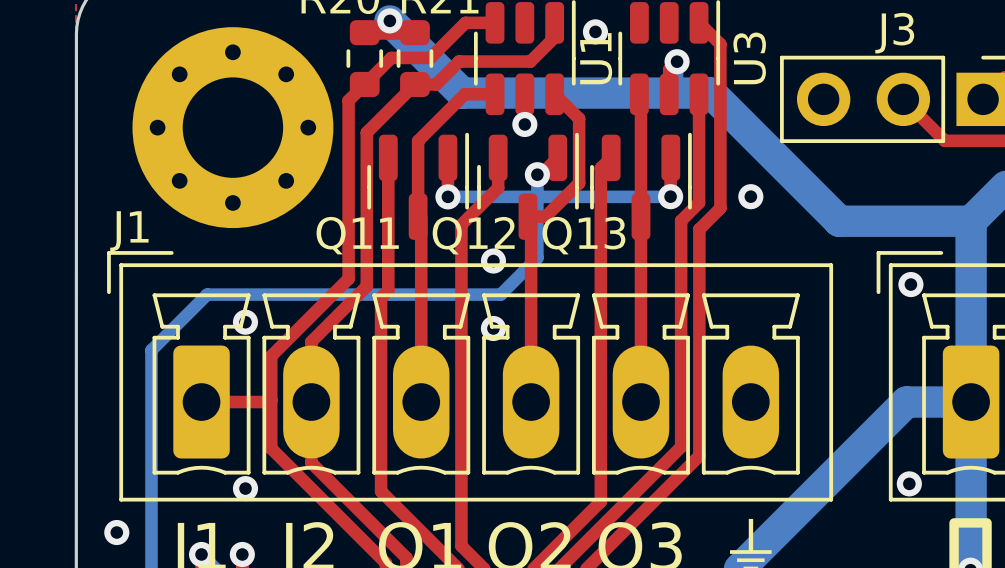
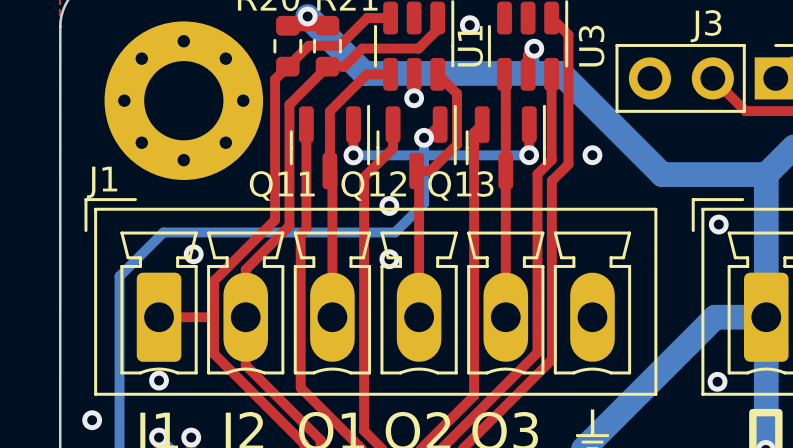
via position: (245, 488) -> (159, 380)

